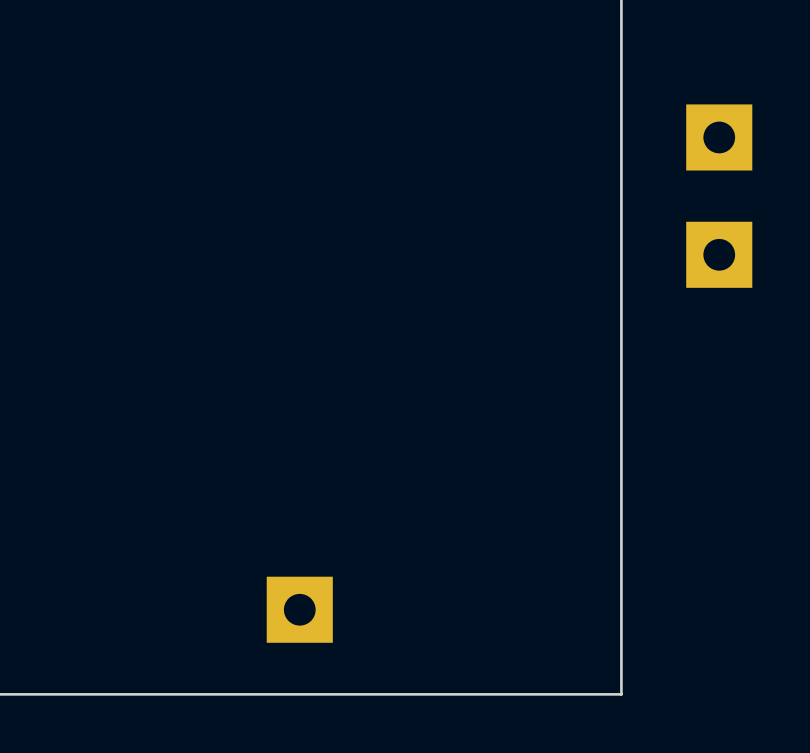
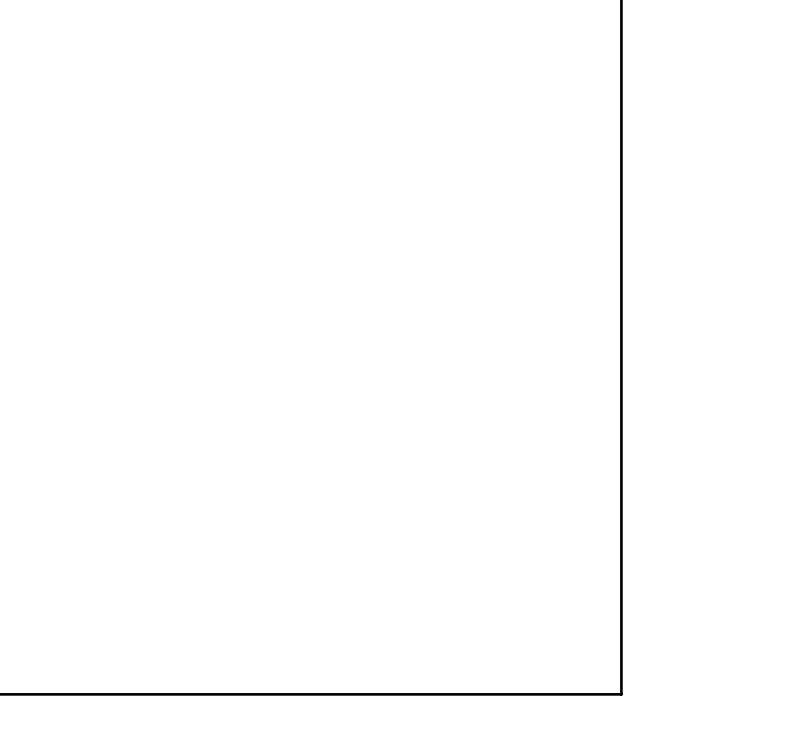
part: (719, 137) -> none
part: (719, 254) -> none
part: (299, 609) -> none

